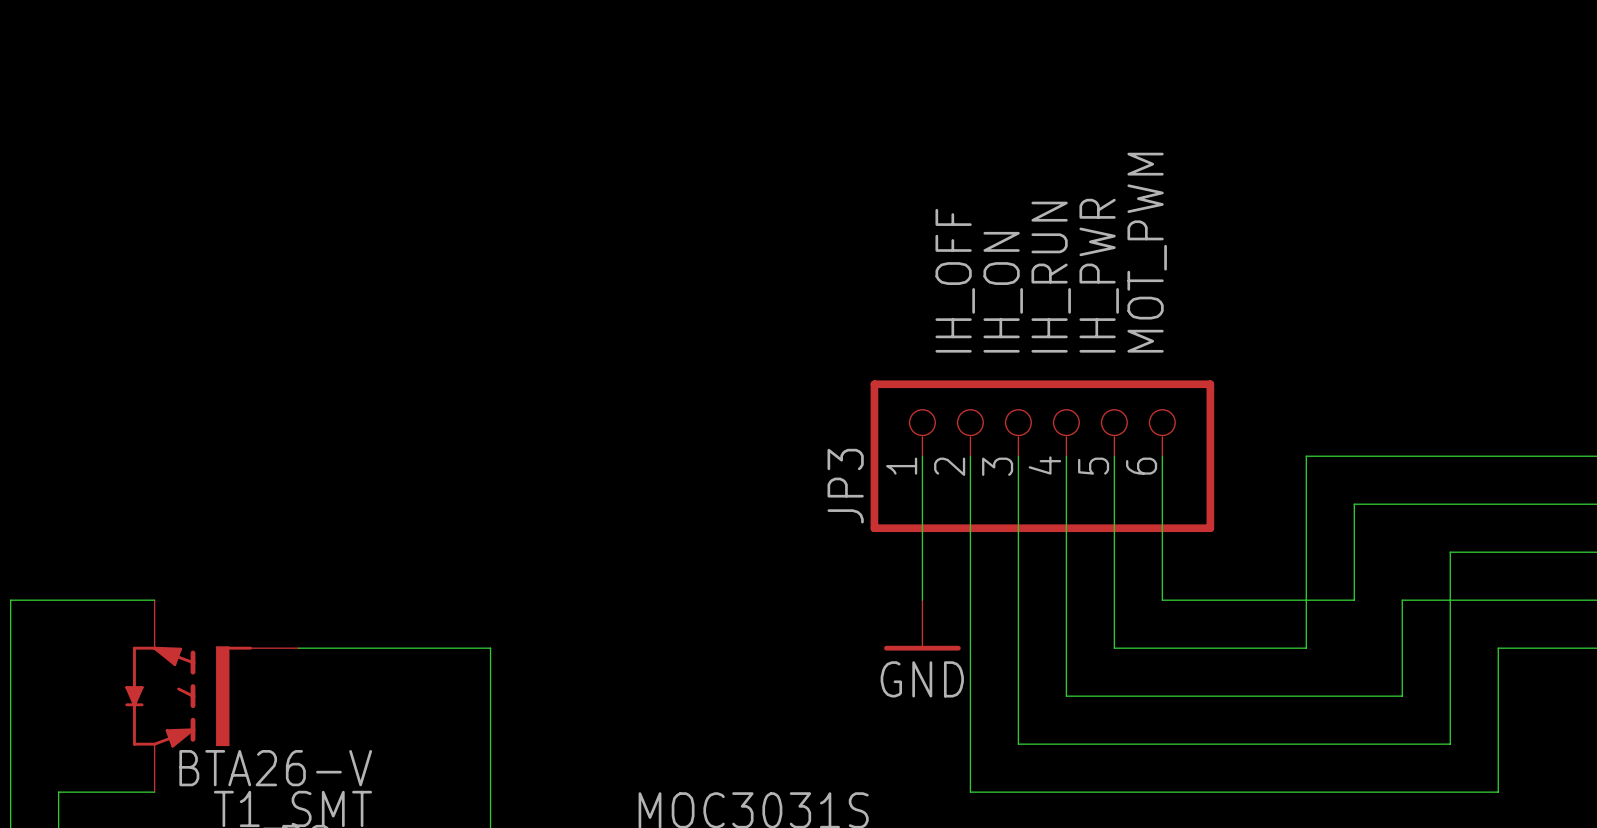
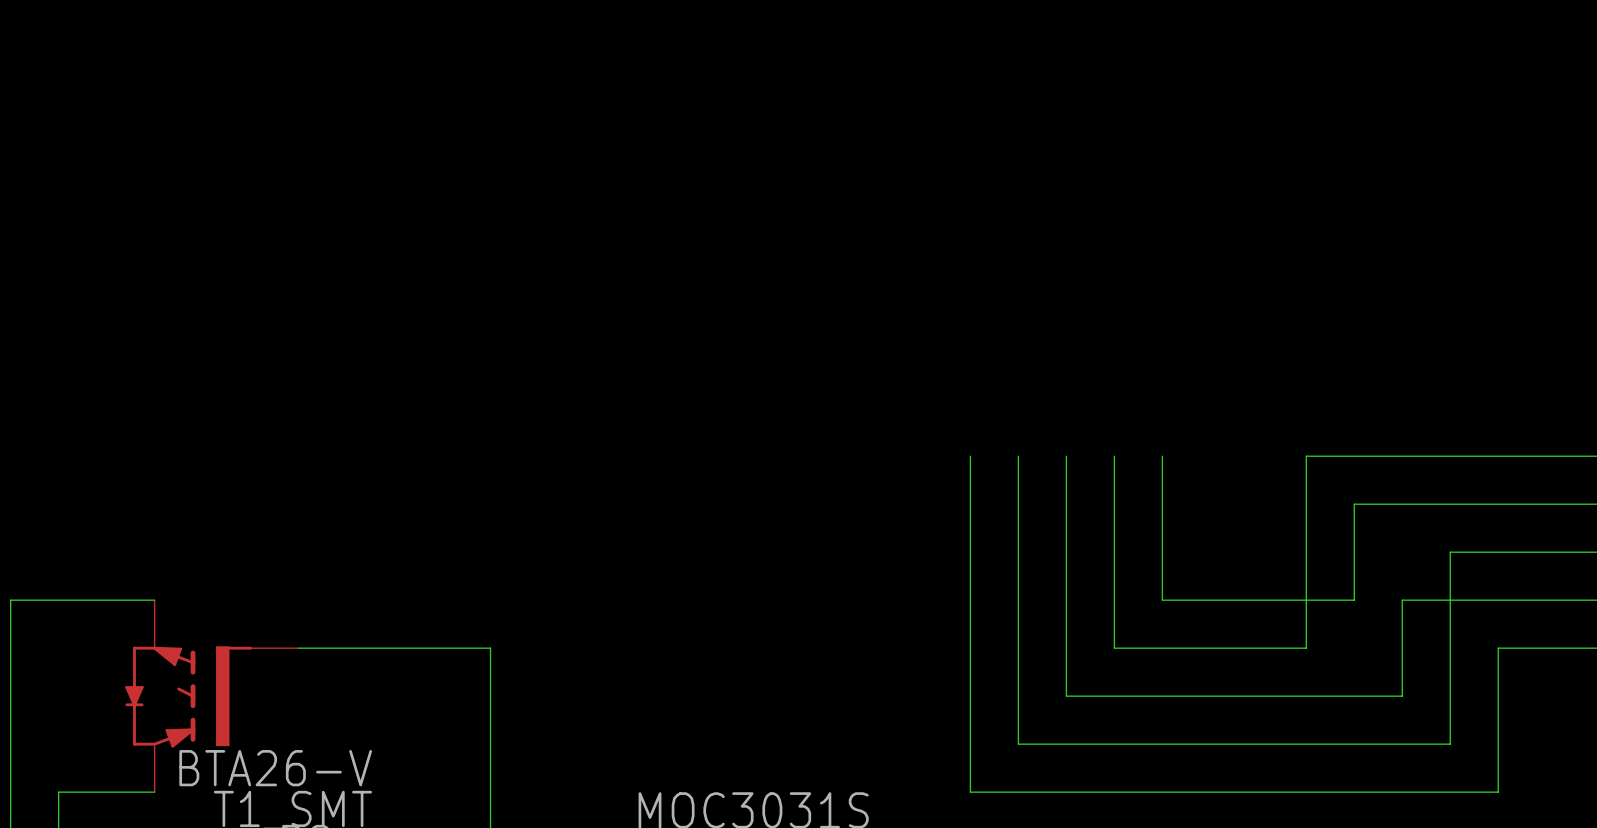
label: MOT_PWM (1147, 252) -> none
label: IH_PWR (1099, 275) -> none
label: IH_RUN (1051, 277) -> none
label: IH_OFF (955, 280) -> none
label: IH_ON (1003, 292) -> none
wire: (922, 456) (922, 600) -> none
JP3: (1042, 456) -> none
power symbol: GND (922, 625) -> none

